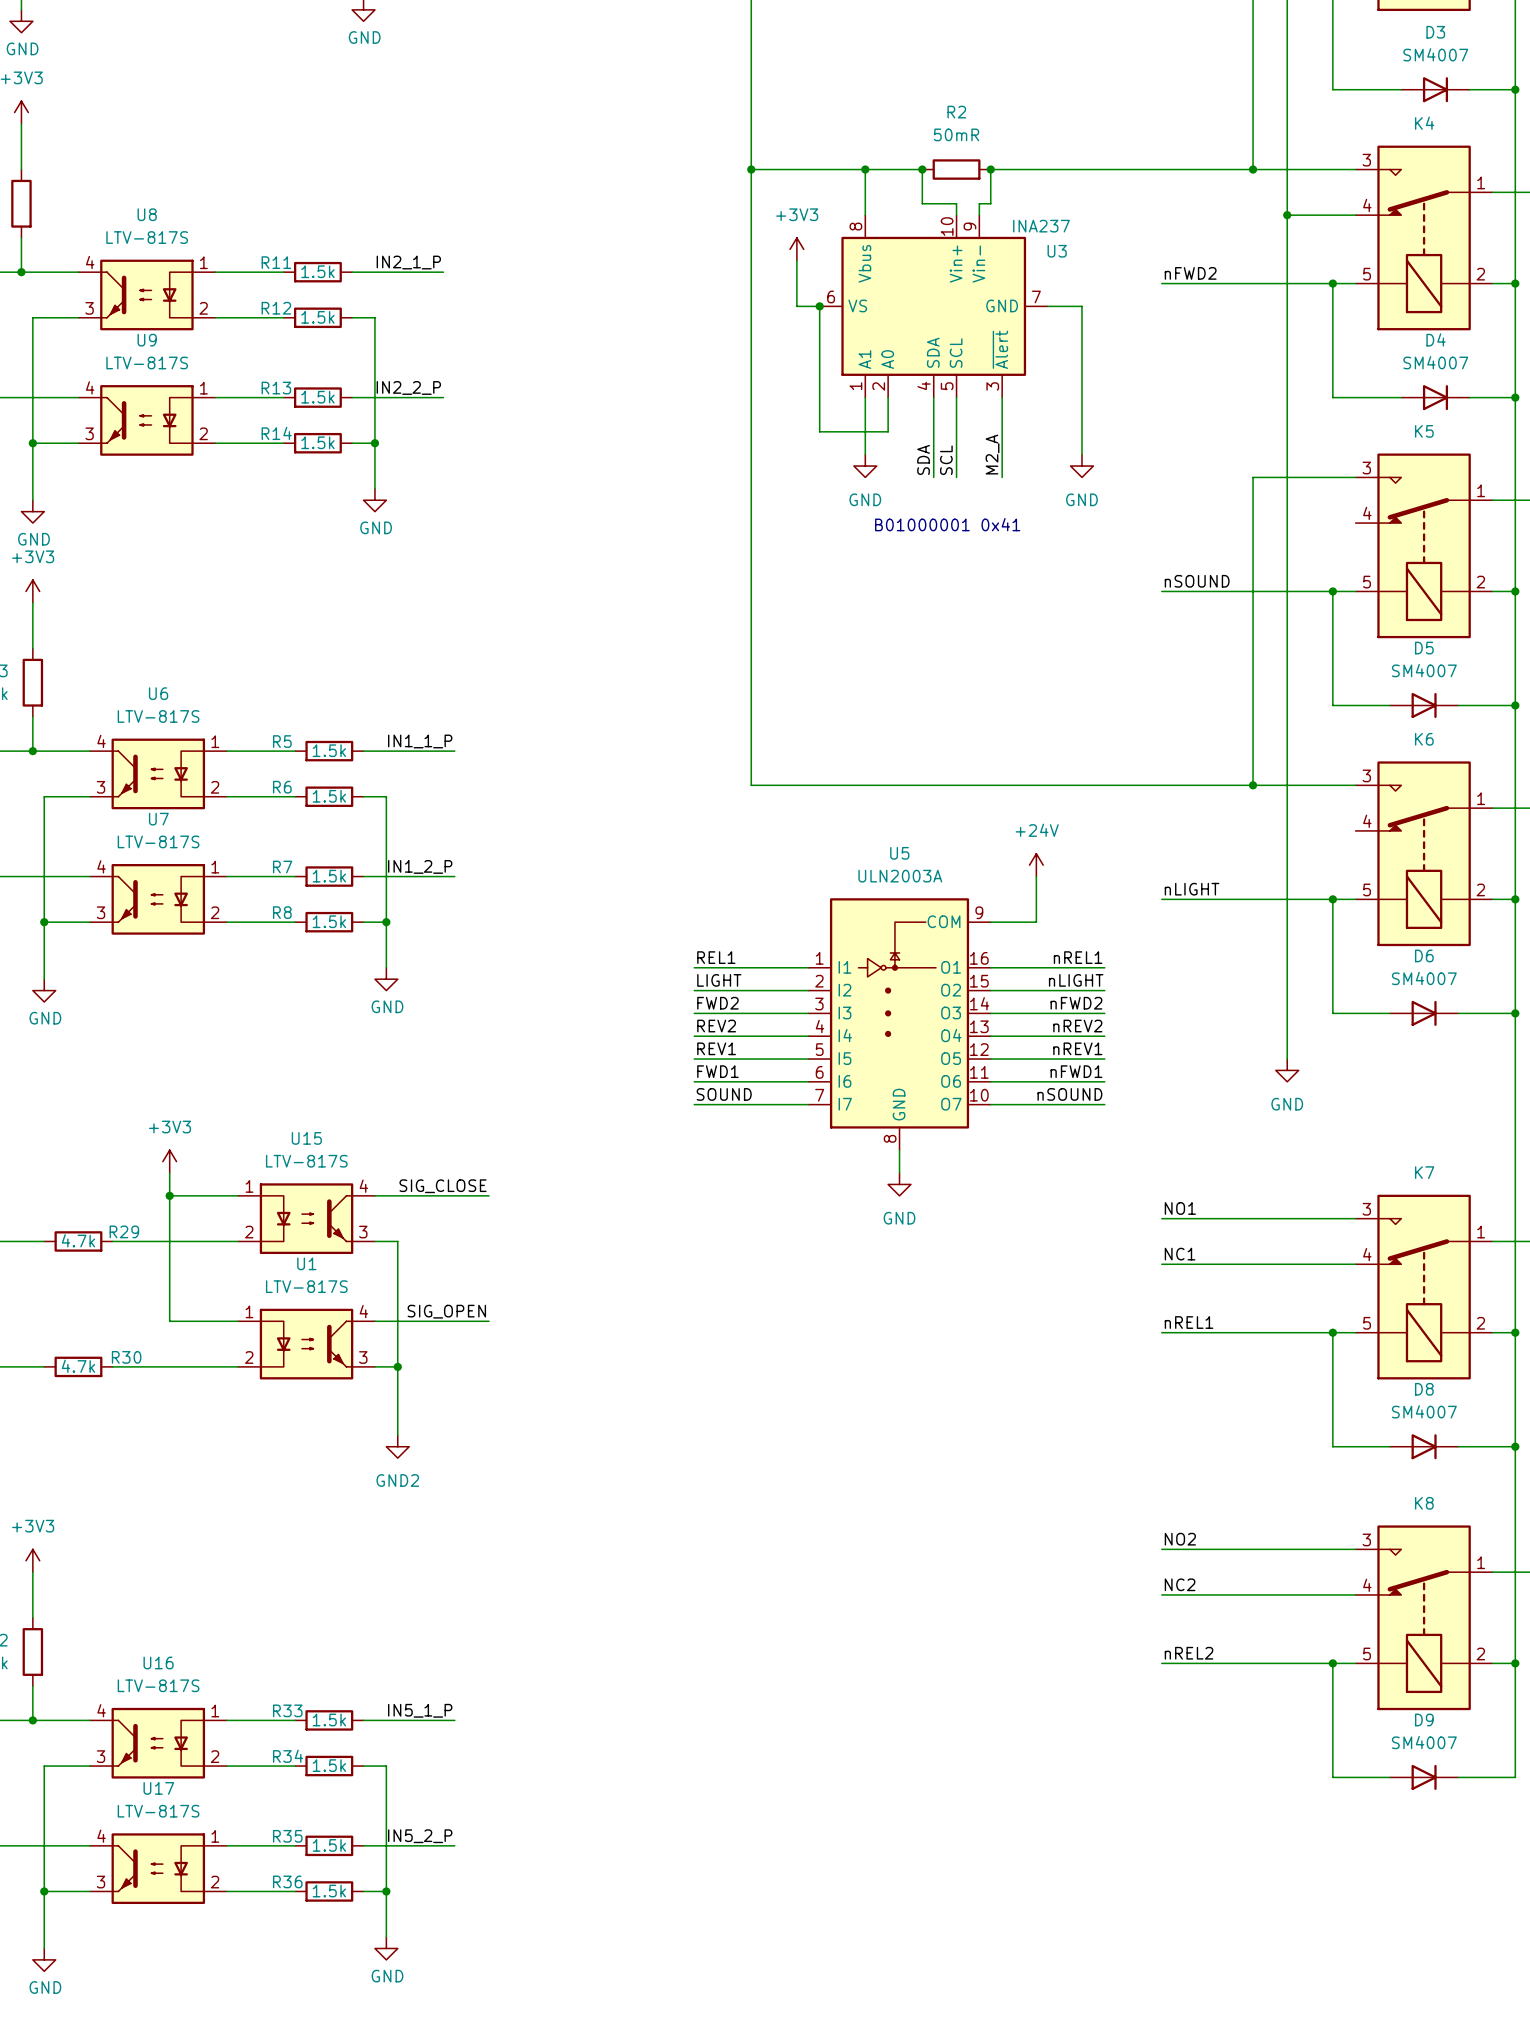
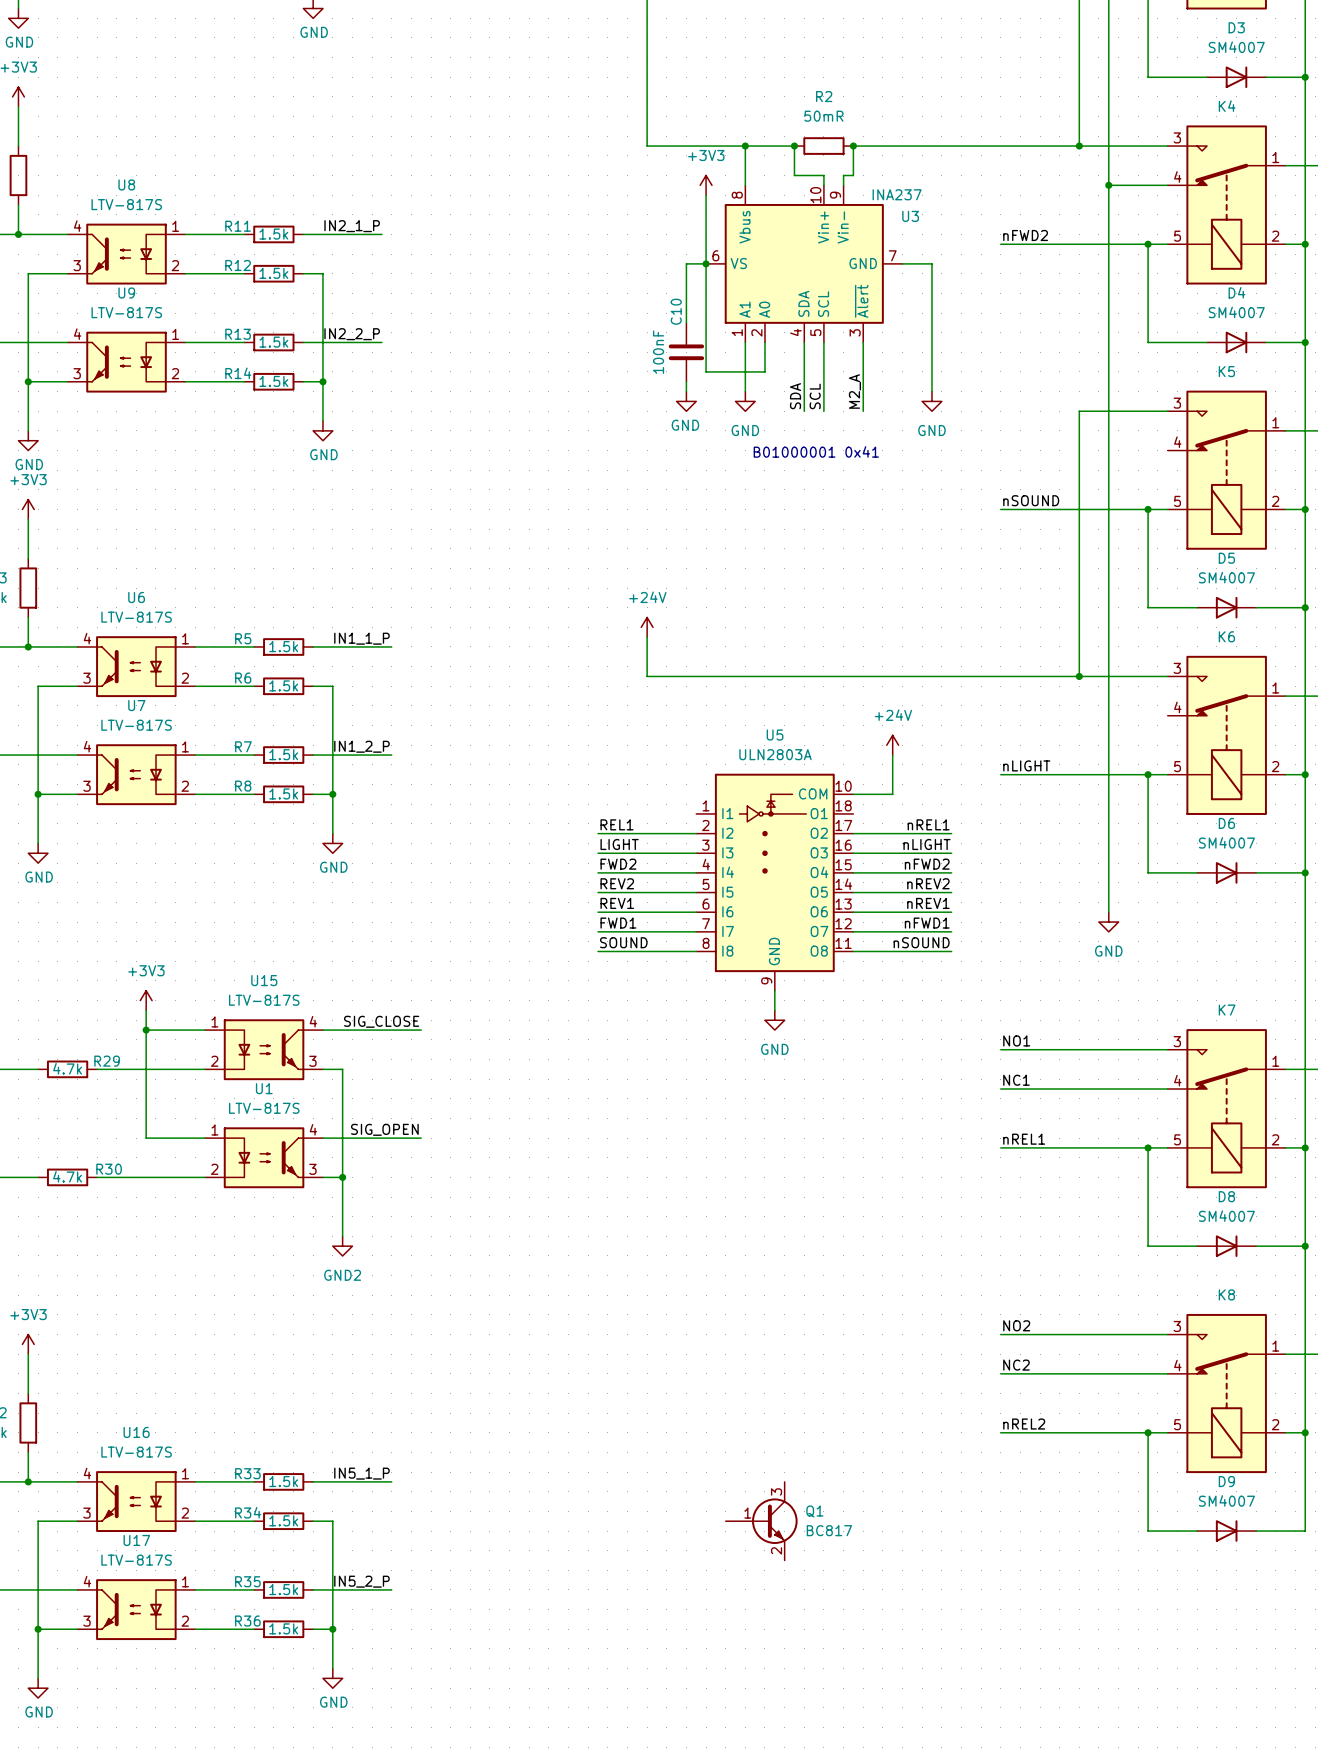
wire: (751, 169) (751, 739) -> none
junction: (751, 169) -> none
wire: none -> (706, 195) (706, 263)
power symbol position: +3V3 (796, 249) -> +3V3 (706, 185)
wire: (796, 260) (796, 306) -> (686, 322) (686, 263)
C10: none -> 100nF (686, 352)
wire: none -> (686, 381) (686, 391)
power symbol: none -> GND (686, 401)
power symbol: none -> +24V (647, 627)
U5 value: ULN2003A (900, 876) -> ULN2803A (775, 754)
U5 symbol: [808, 898, 991, 1151] -> [696, 773, 854, 991]
Q1: none -> BC817 (761, 1521)

